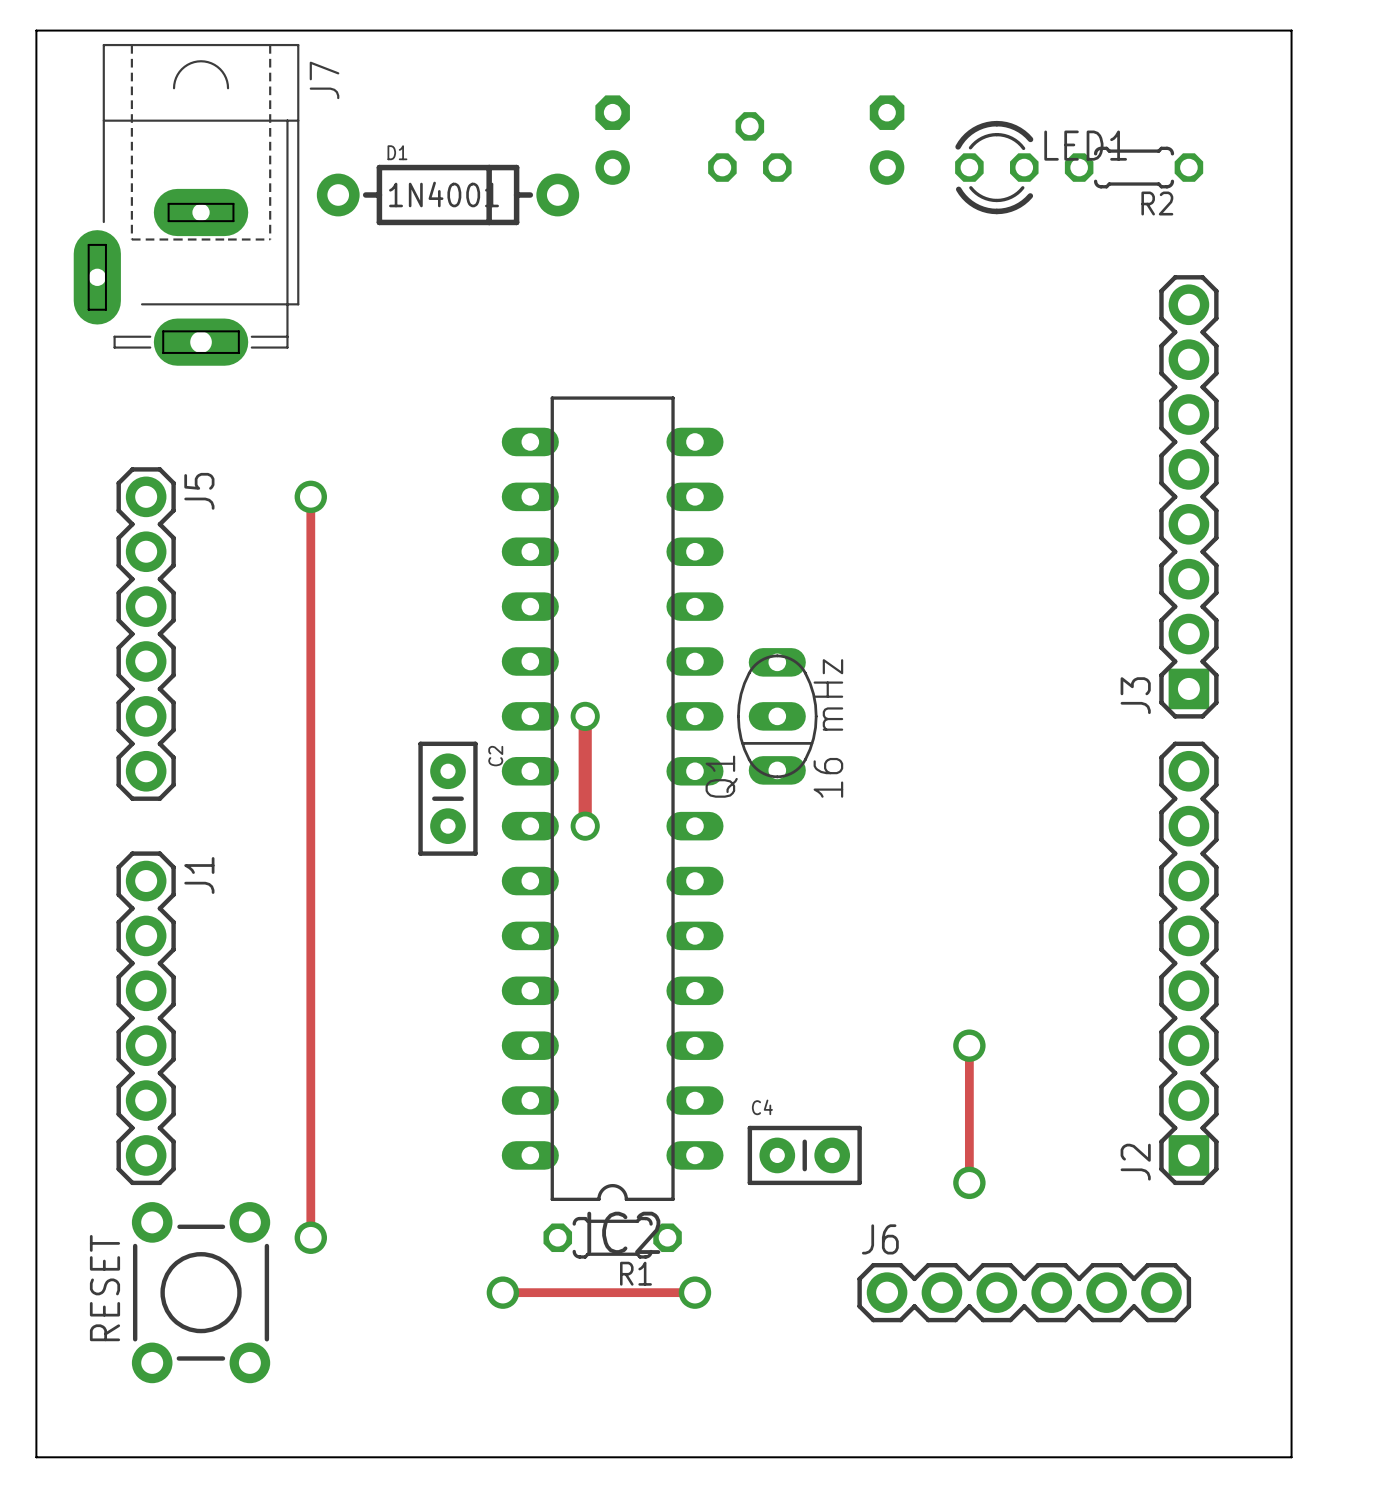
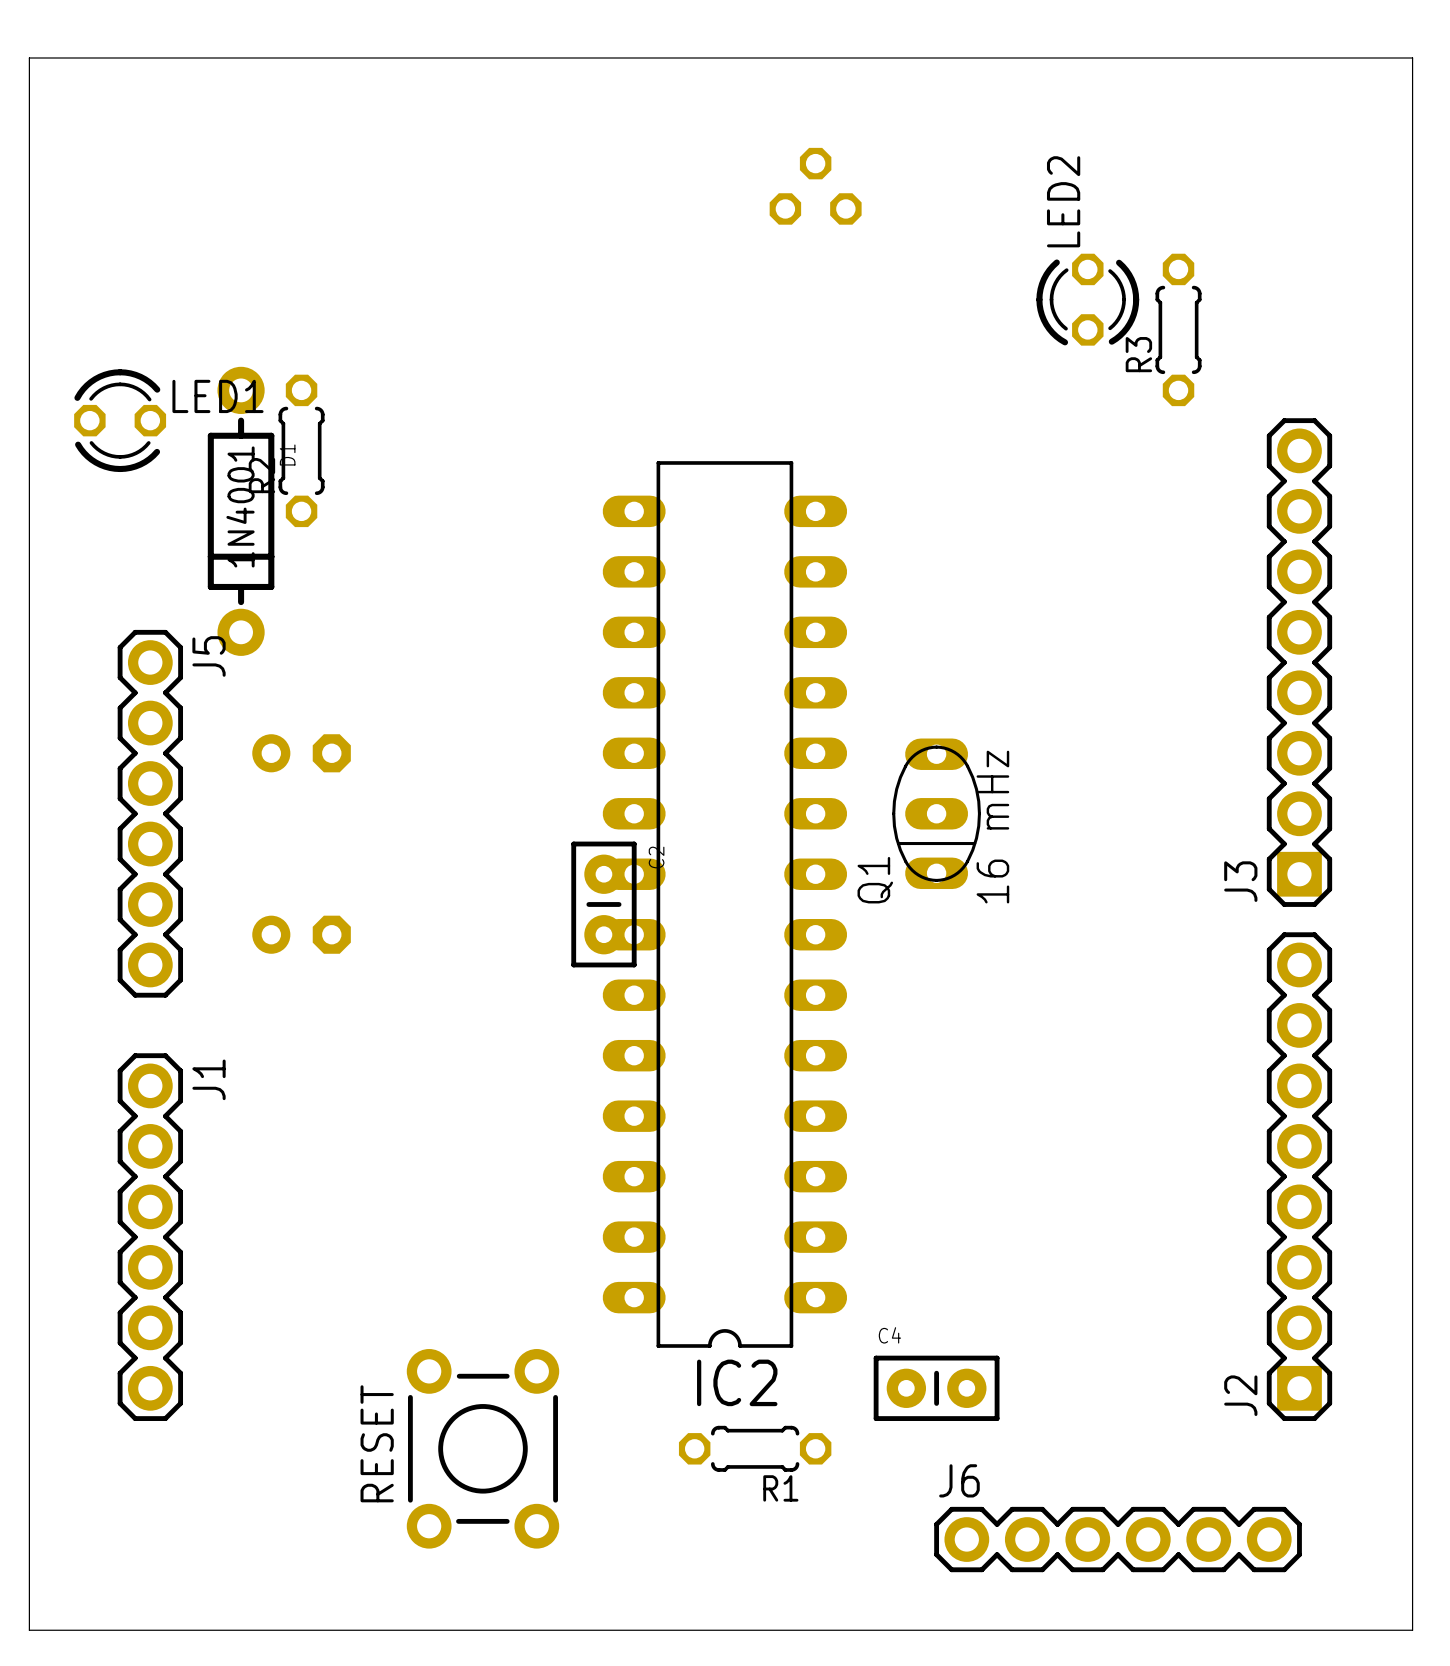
part: (612, 140) -> none
part: (887, 140) -> none
LED1 position: (996, 167) -> (120, 420)
R2 rotation: 0° (1134, 167) -> 90° clockwise (301, 450)
R2 position: (1134, 167) -> (301, 450)
D1 rotation: 0° (448, 195) -> 90° clockwise (241, 511)
D1 position: (448, 195) -> (241, 511)
J7: (186, 204) -> none
LED2: none -> (1087, 299)
R3: none -> (1178, 329)
track: (310, 496) (310, 1237) -> none
via: (310, 496) -> none
J3 position: (1188, 496) -> (1299, 662)
J5 position: (146, 634) -> (150, 813)
part: none -> (301, 753)
track: (585, 716) (585, 826) -> none
via: (585, 716) -> none
Q1 position: (777, 716) -> (936, 813)
C2 position: (448, 798) -> (603, 904)
IC2 position: (612, 798) -> (724, 904)
part: none -> (301, 934)
via: (585, 826) -> none
J2 position: (1188, 963) -> (1299, 1176)
J1 position: (146, 1018) -> (150, 1237)
track: (969, 1045) (969, 1182) -> none
via: (969, 1045) -> none
C4 position: (804, 1155) -> (936, 1388)
via: (969, 1182) -> none
via: (310, 1237) -> none
R1 position: (612, 1237) -> (755, 1448)
RESET position: (201, 1292) -> (482, 1448)
track: (502, 1292) (694, 1292) -> none
via: (502, 1292) -> none
via: (694, 1292) -> none
J6 position: (1024, 1292) -> (1118, 1539)

